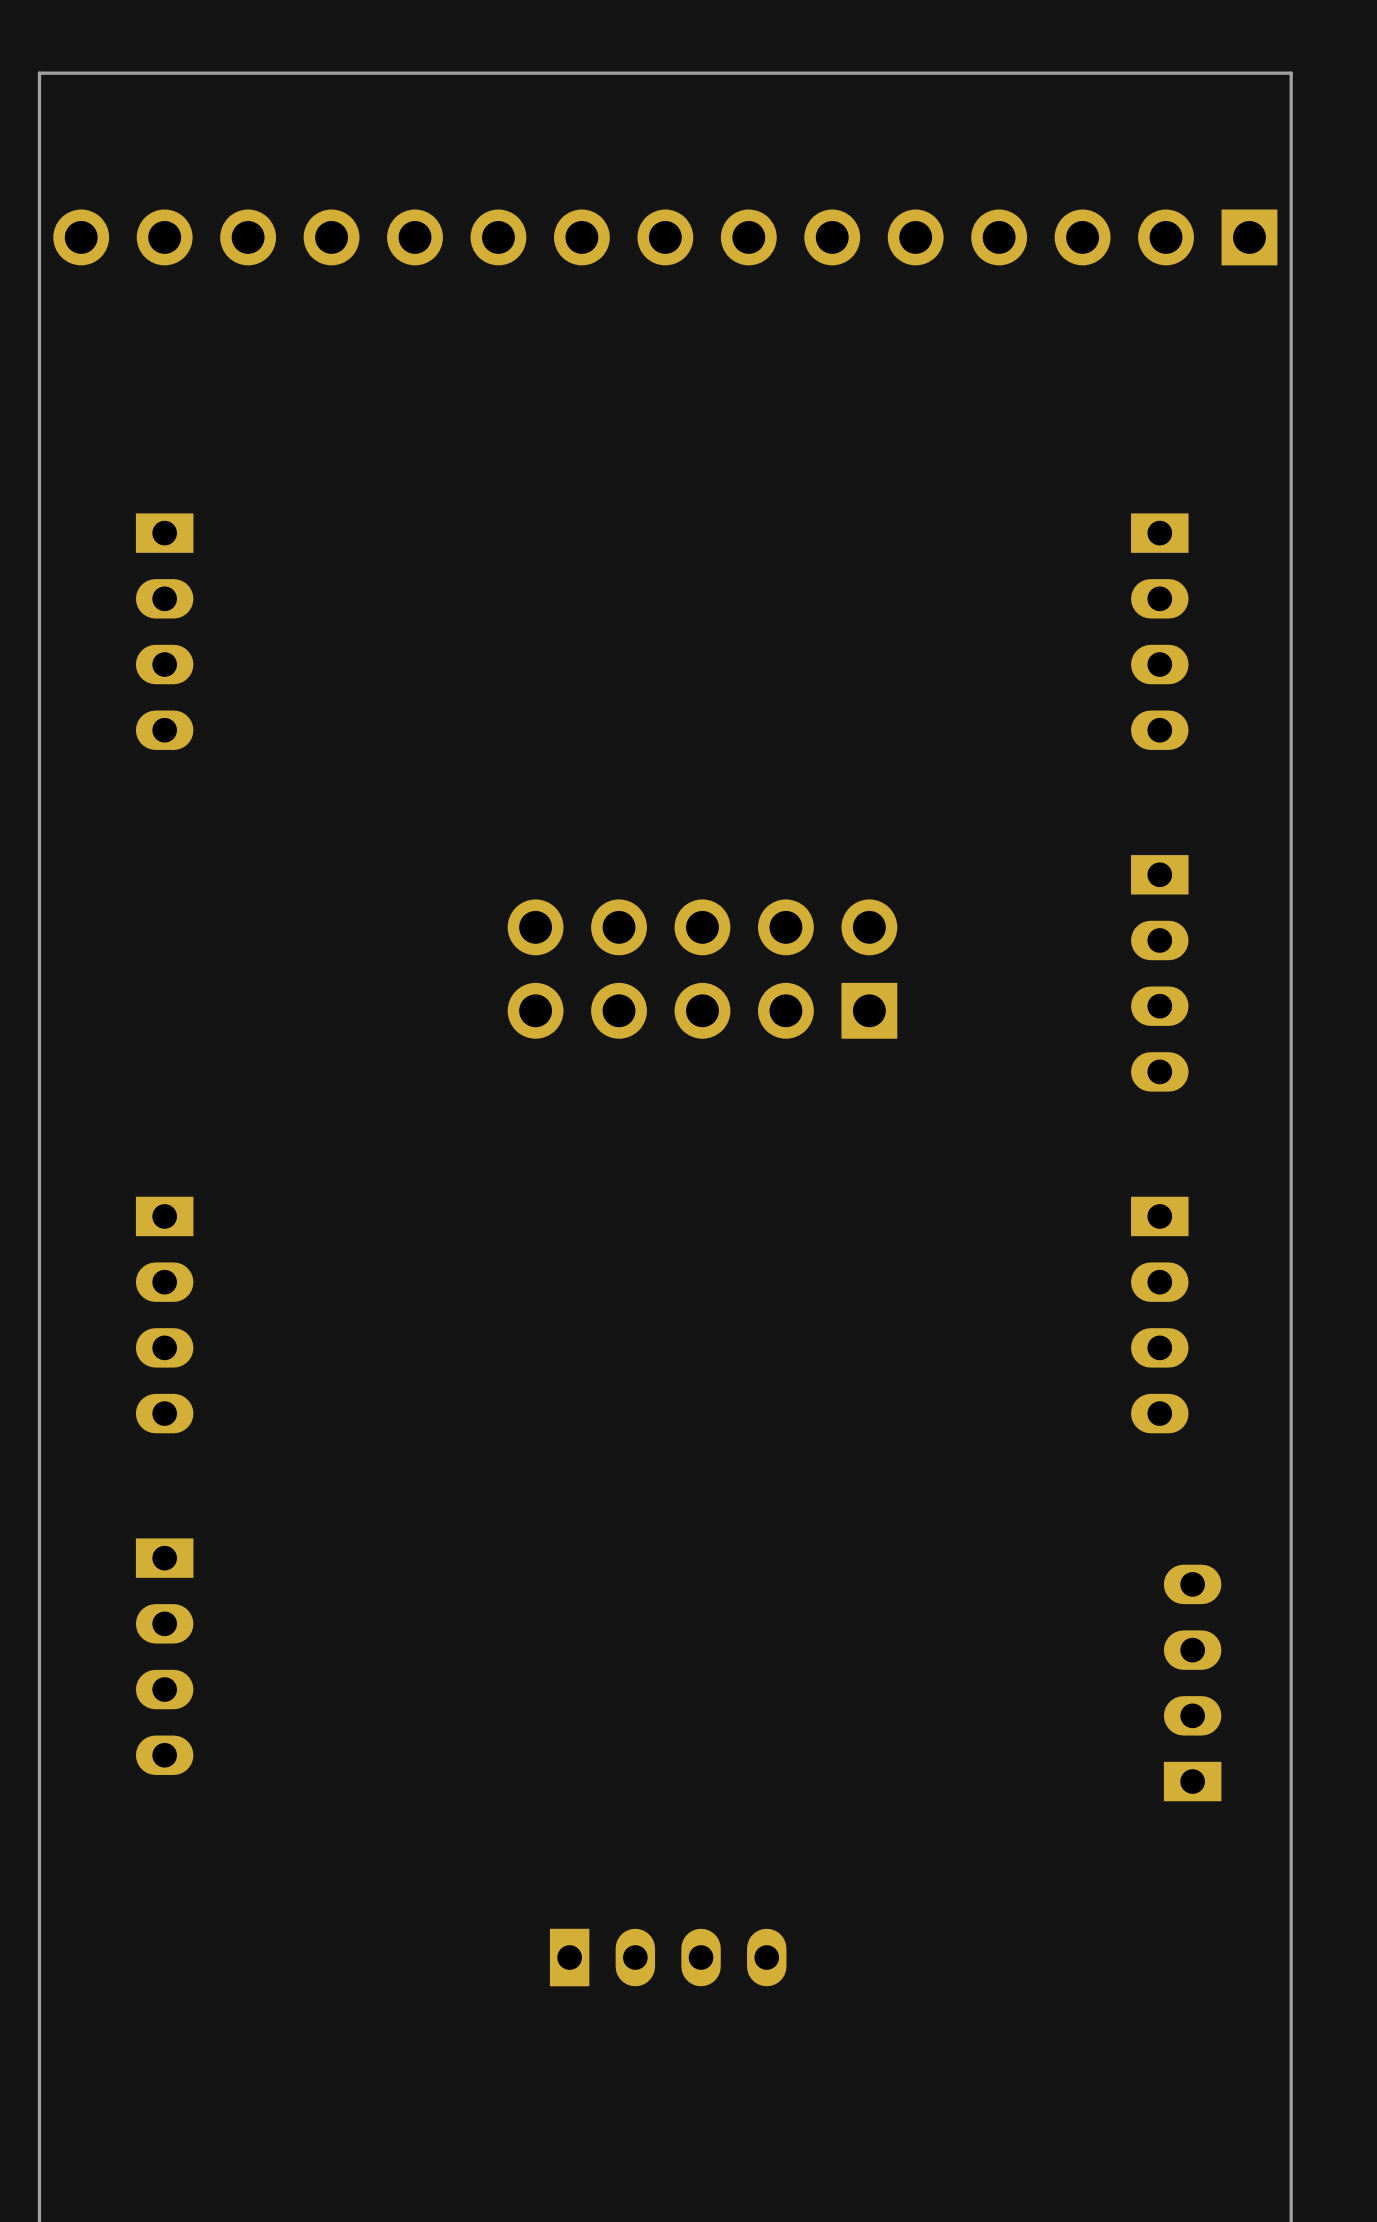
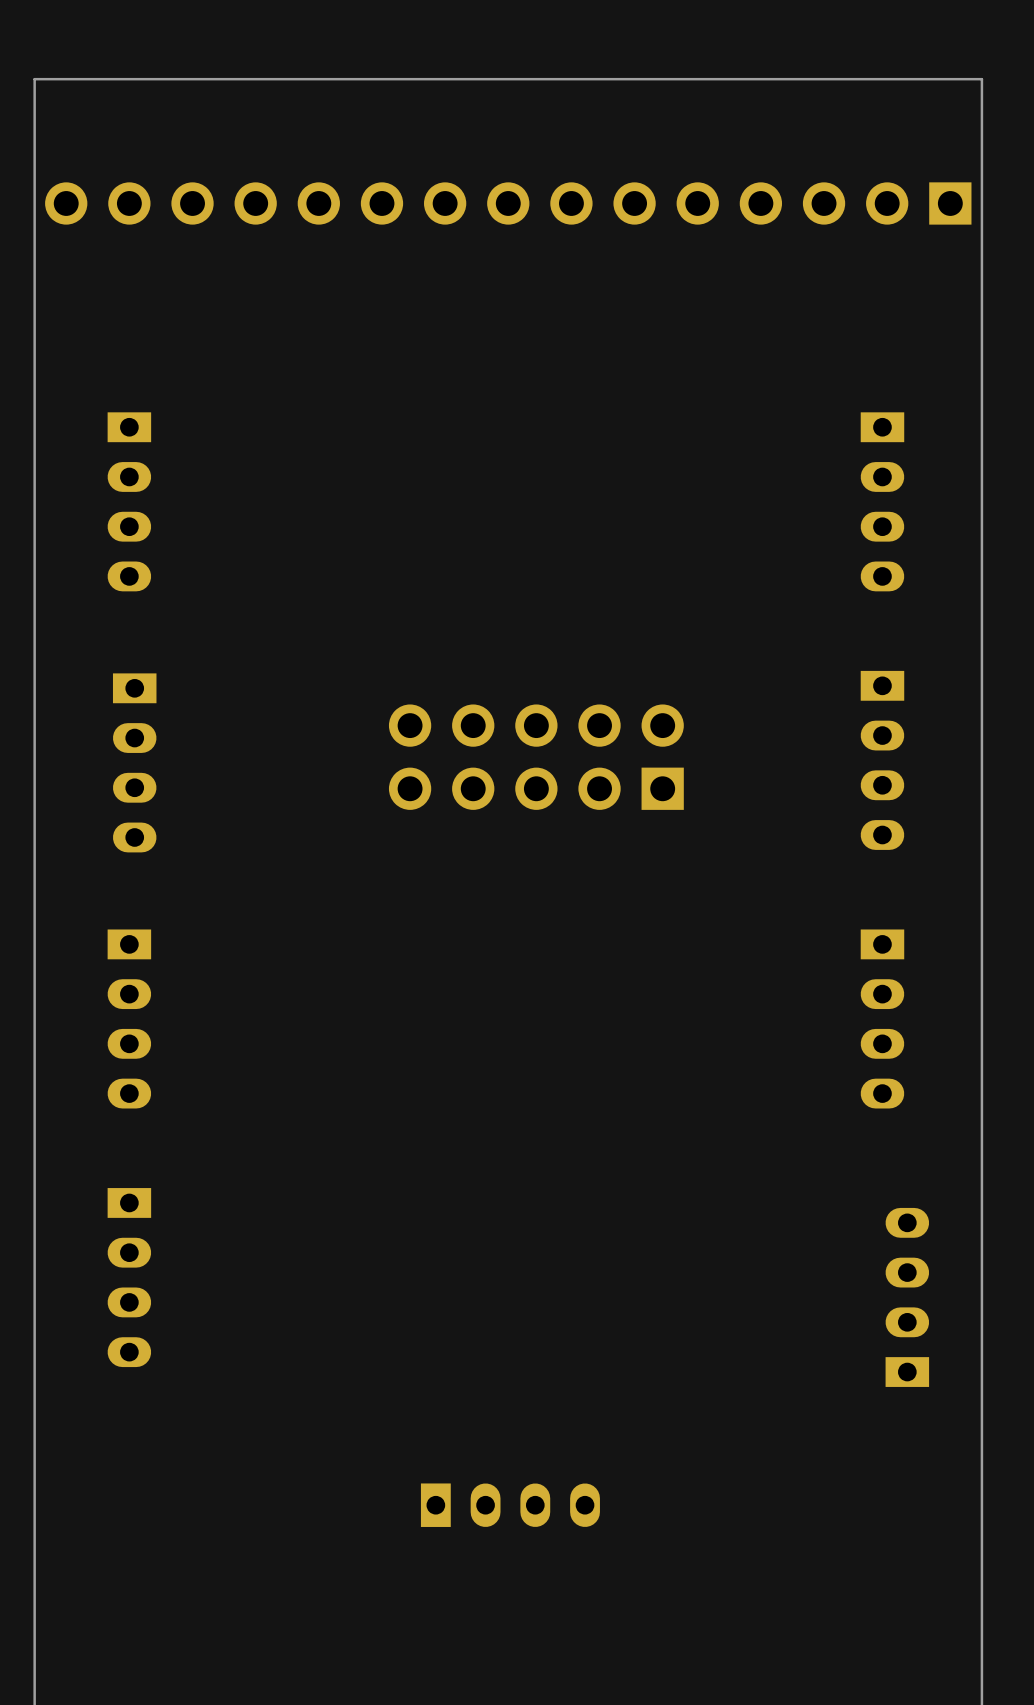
part: none -> (134, 762)

